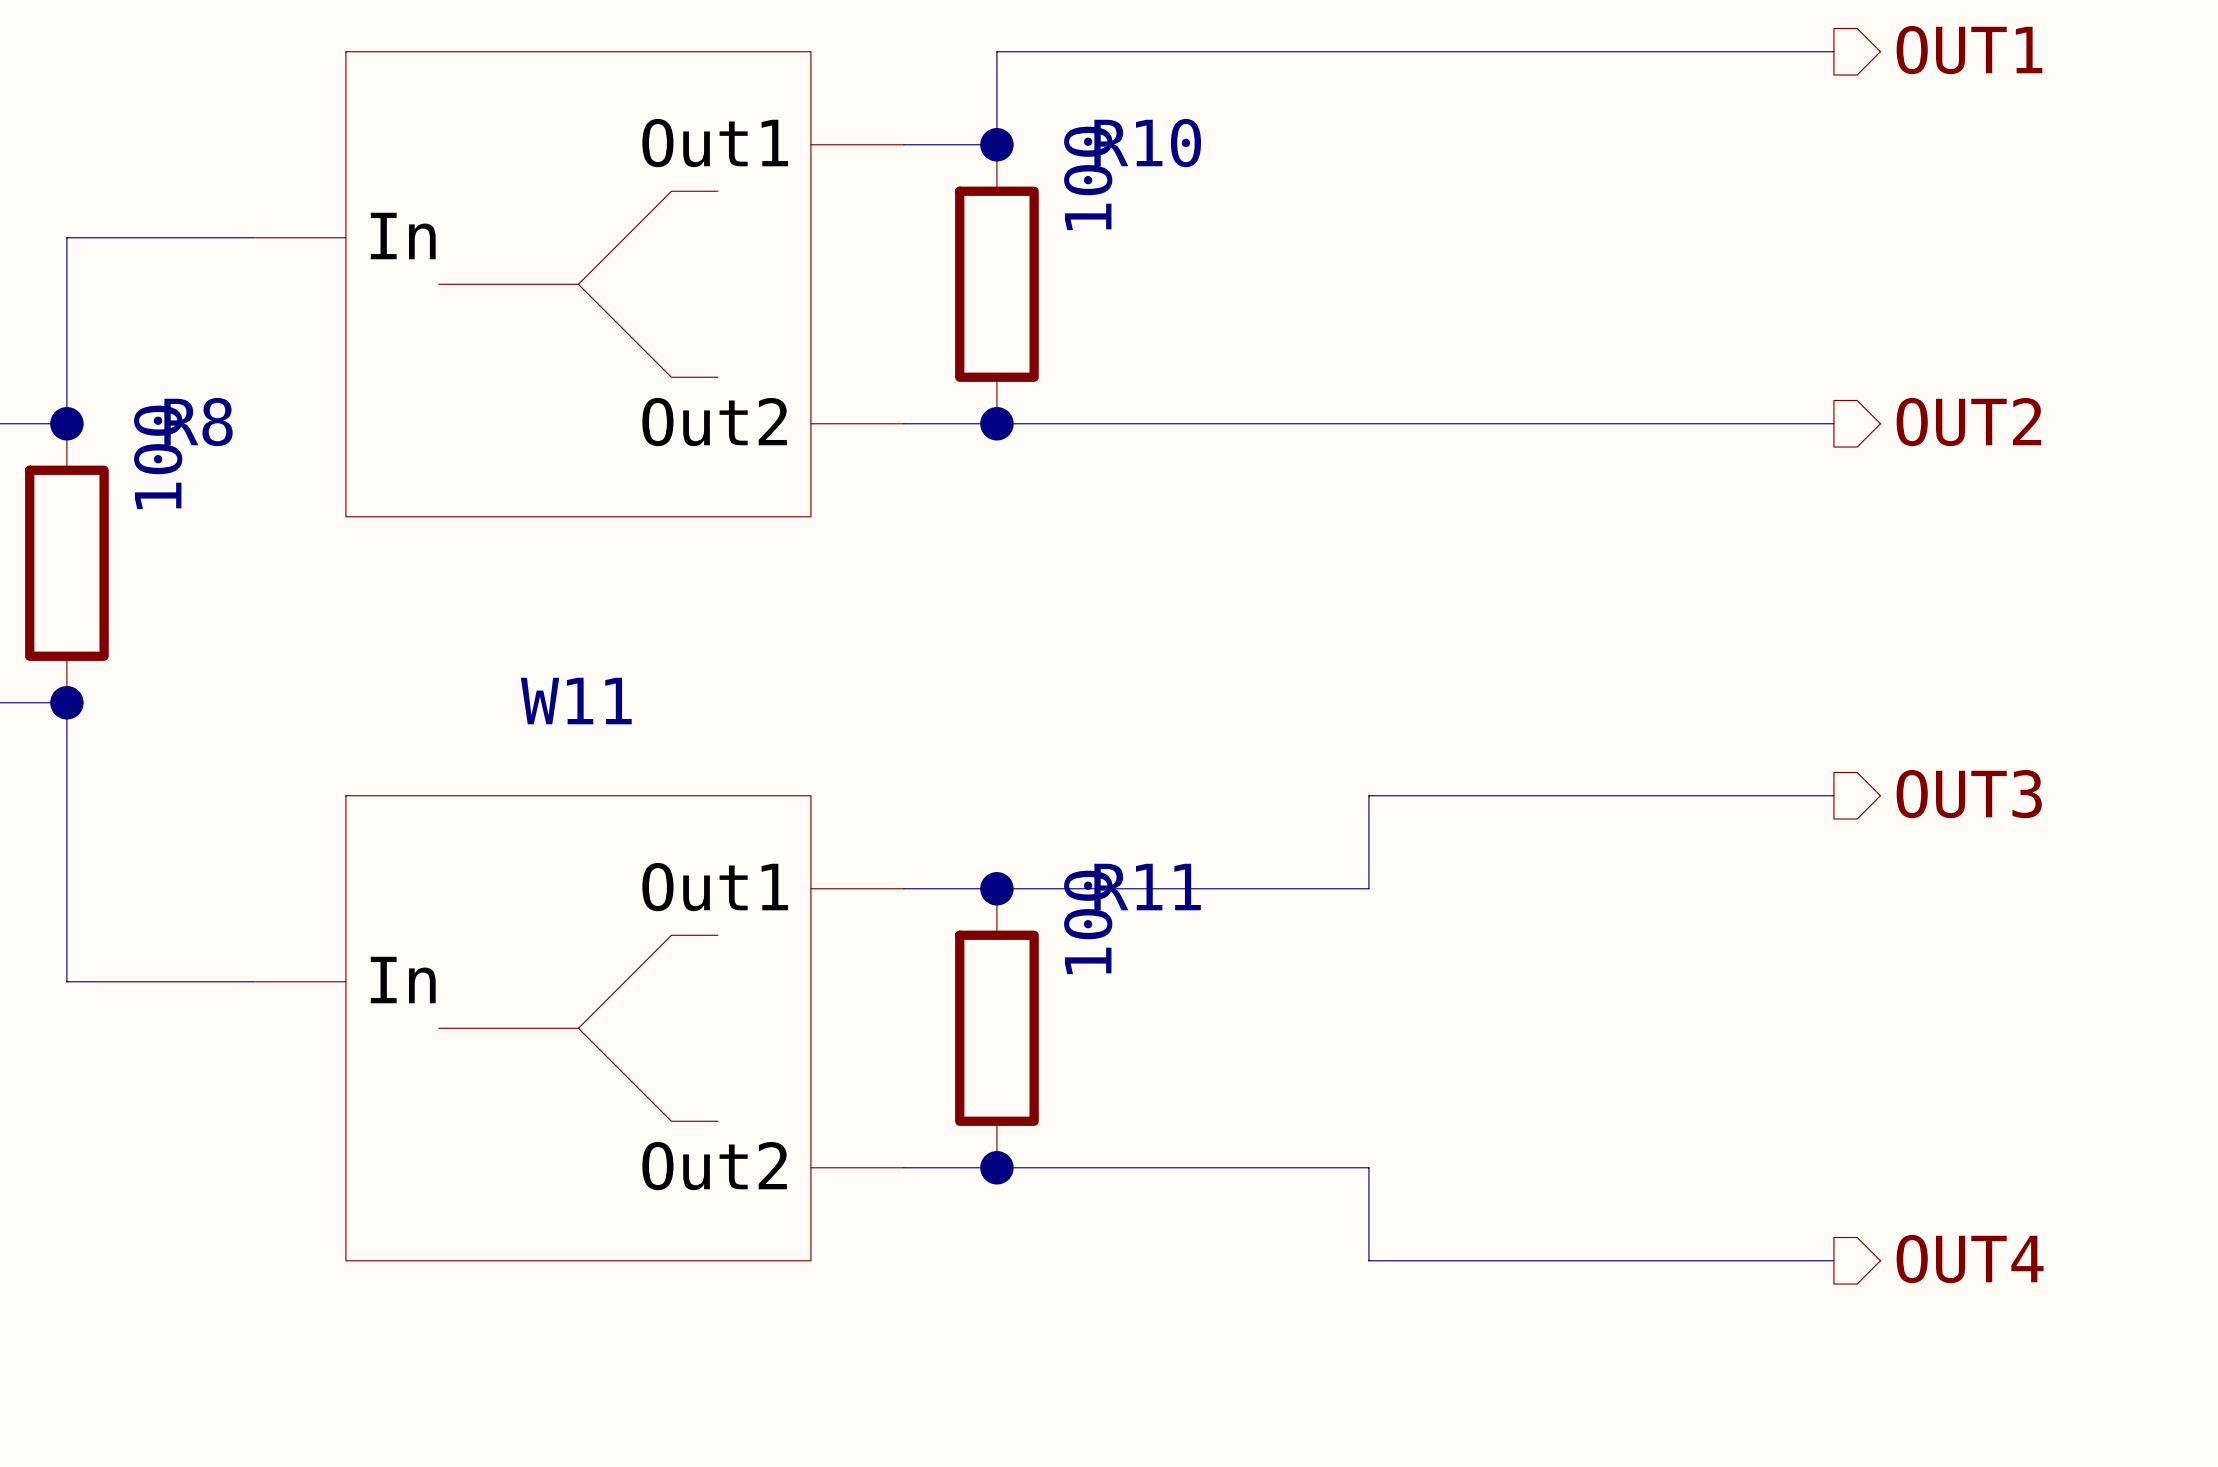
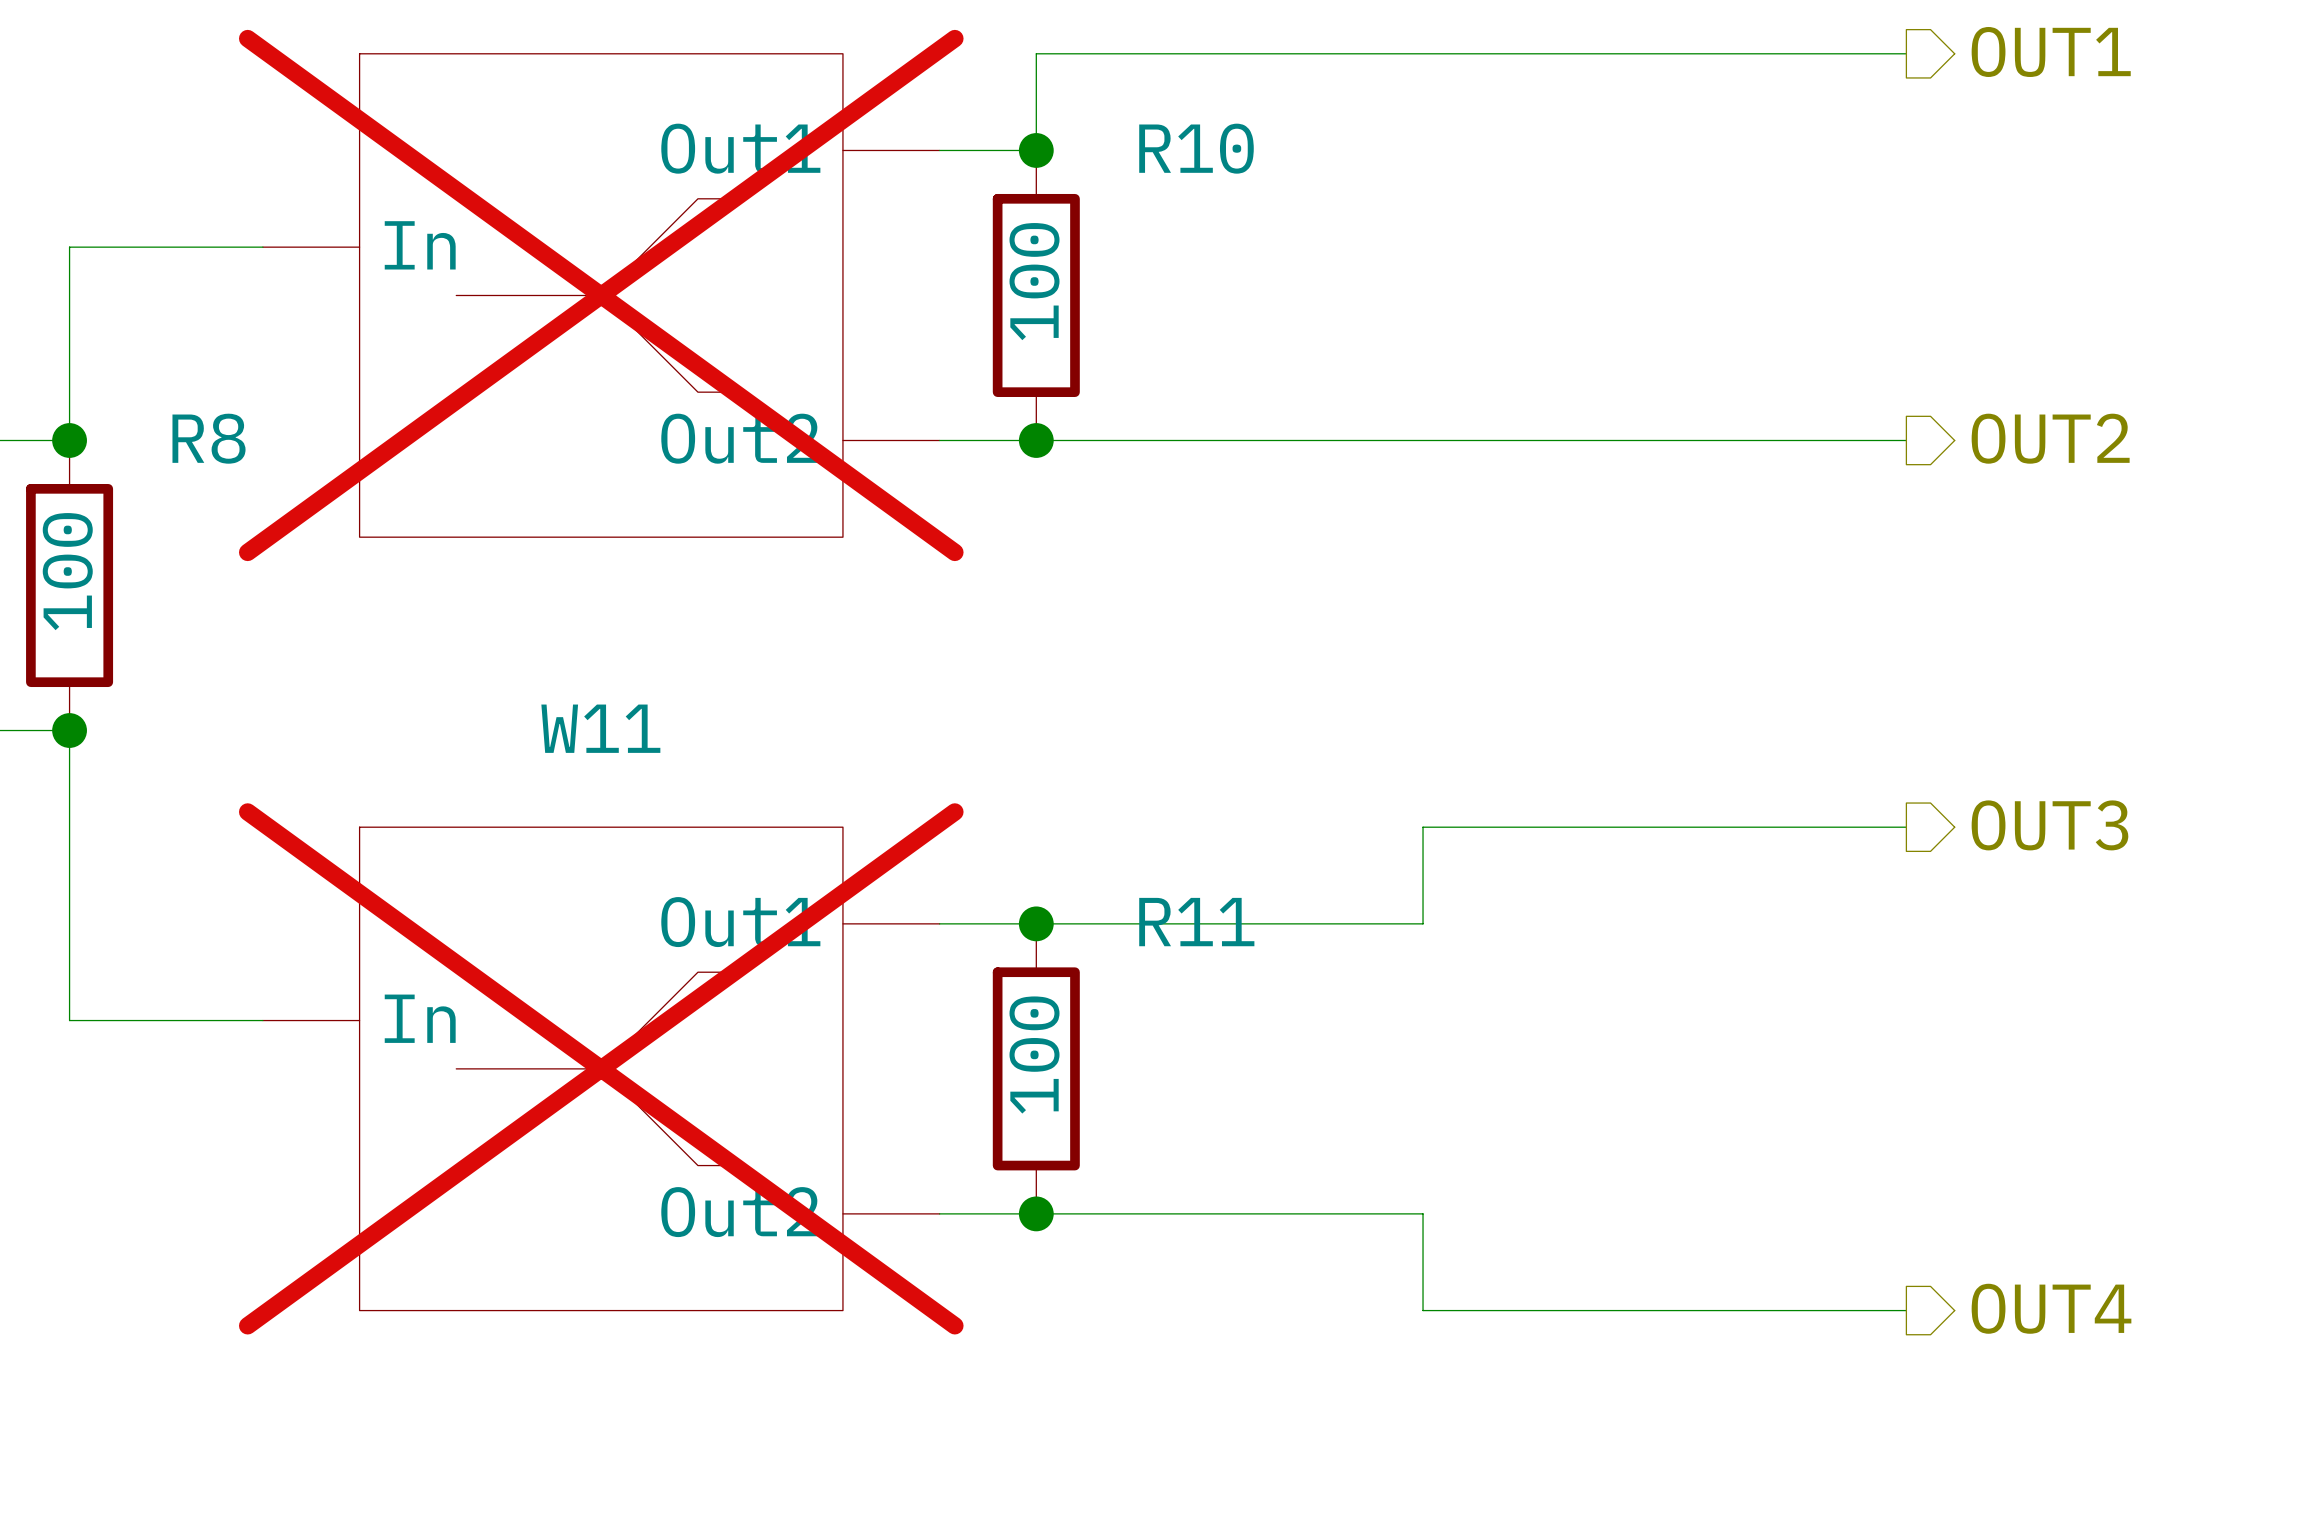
R10 value position: 100 (1088, 178) -> 100 (1034, 281)
part do-not-place cross: none -> (601, 295)
R8 value position: 100 (158, 457) -> 100 (67, 571)
R11 value position: 100 (1088, 922) -> 100 (1034, 1054)
W11 do-not-place cross: none -> (601, 1068)

